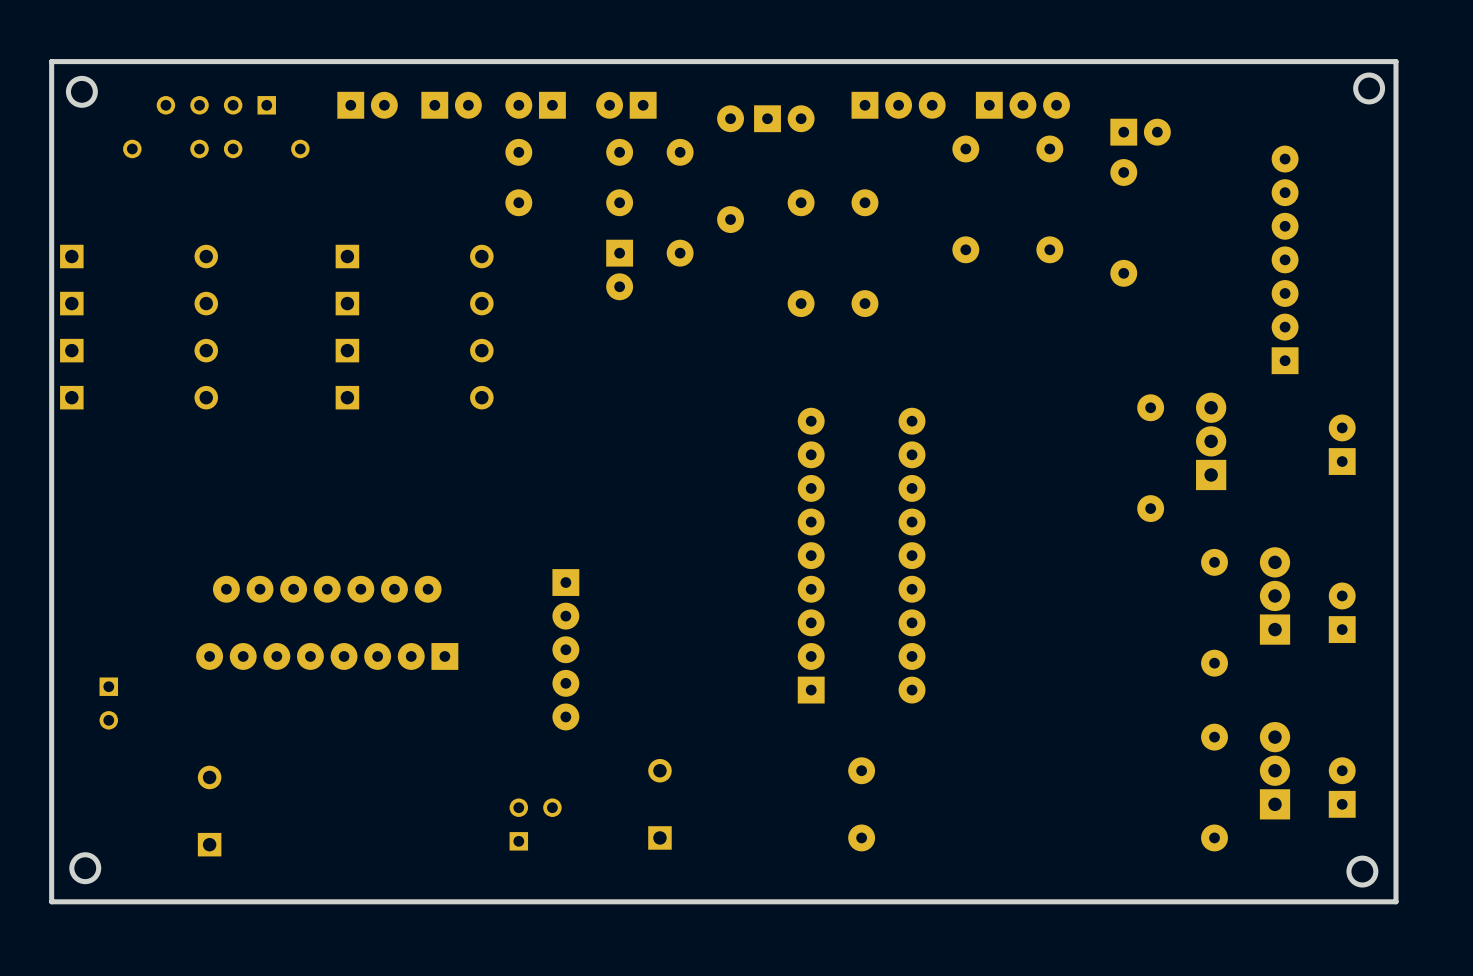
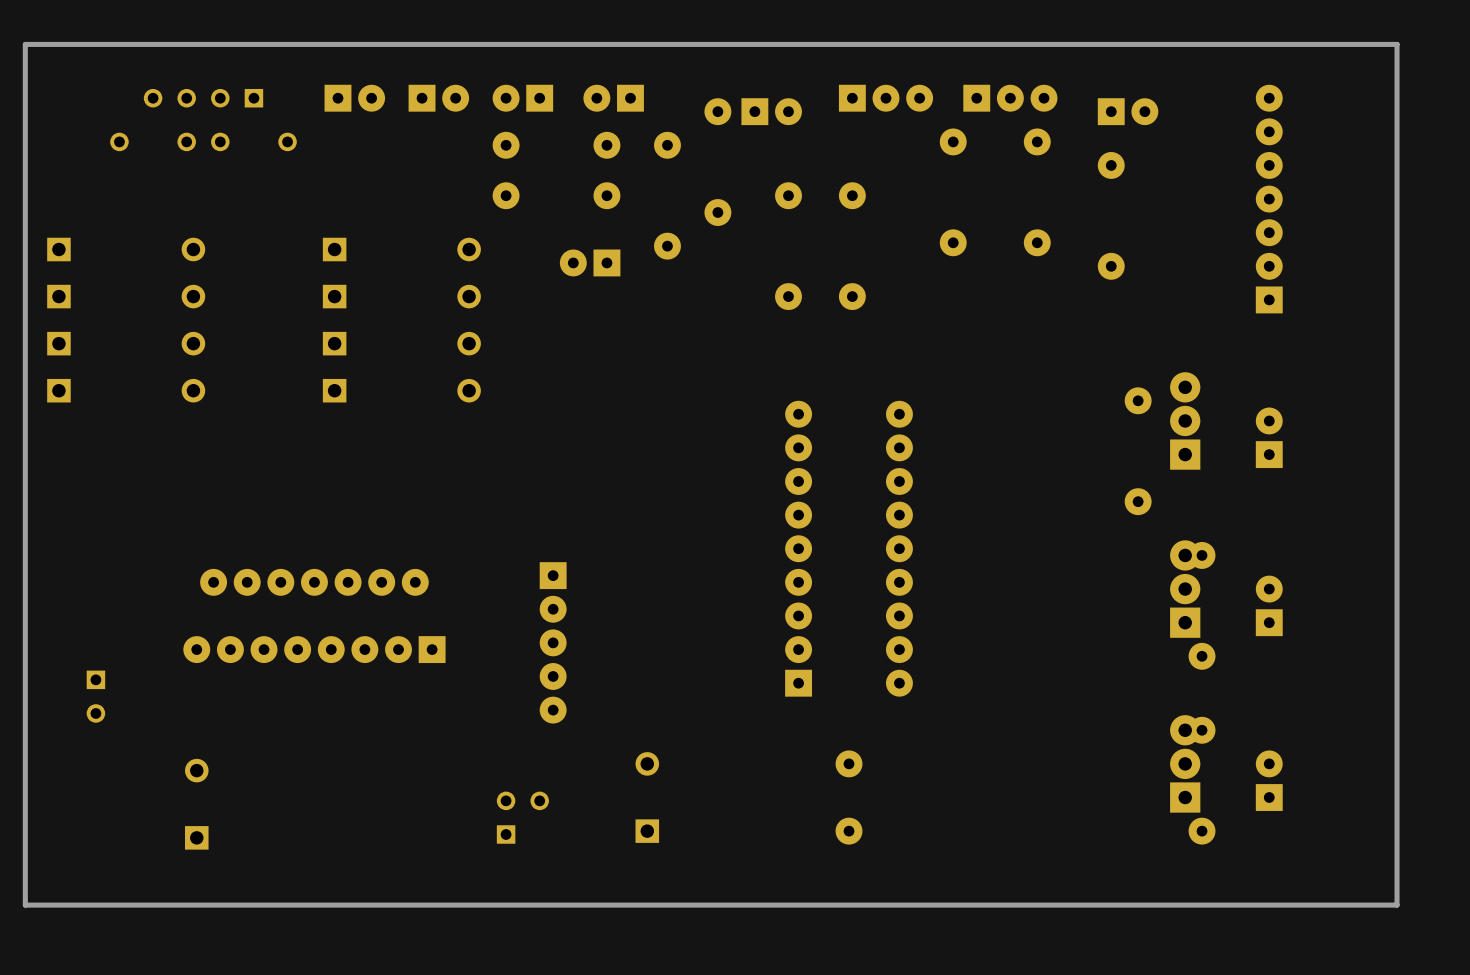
board edge: (1396, 61) (51, 61) (51, 901) (1396, 901) (1396, 61) -> (1397, 44) (1397, 905) (25, 905) (25, 44) (1397, 44)
round board edge: [1353, 72, 1386, 105] -> none
round board edge: [65, 75, 98, 108] -> none
part position: (1140, 132) -> (1128, 111)
part position: (1285, 259) -> (1269, 199)
part rotation: 0° (619, 269) -> 90° clockwise (590, 262)
part position: (1211, 441) -> (1185, 420)
part position: (1342, 444) -> (1269, 437)
part position: (1275, 595) -> (1185, 589)
part position: (1342, 612) -> (1269, 605)
part position: (1275, 770) -> (1185, 763)
part position: (1342, 787) -> (1269, 780)
round board edge: [69, 852, 102, 885] -> none
round board edge: [1346, 855, 1379, 888] -> none

